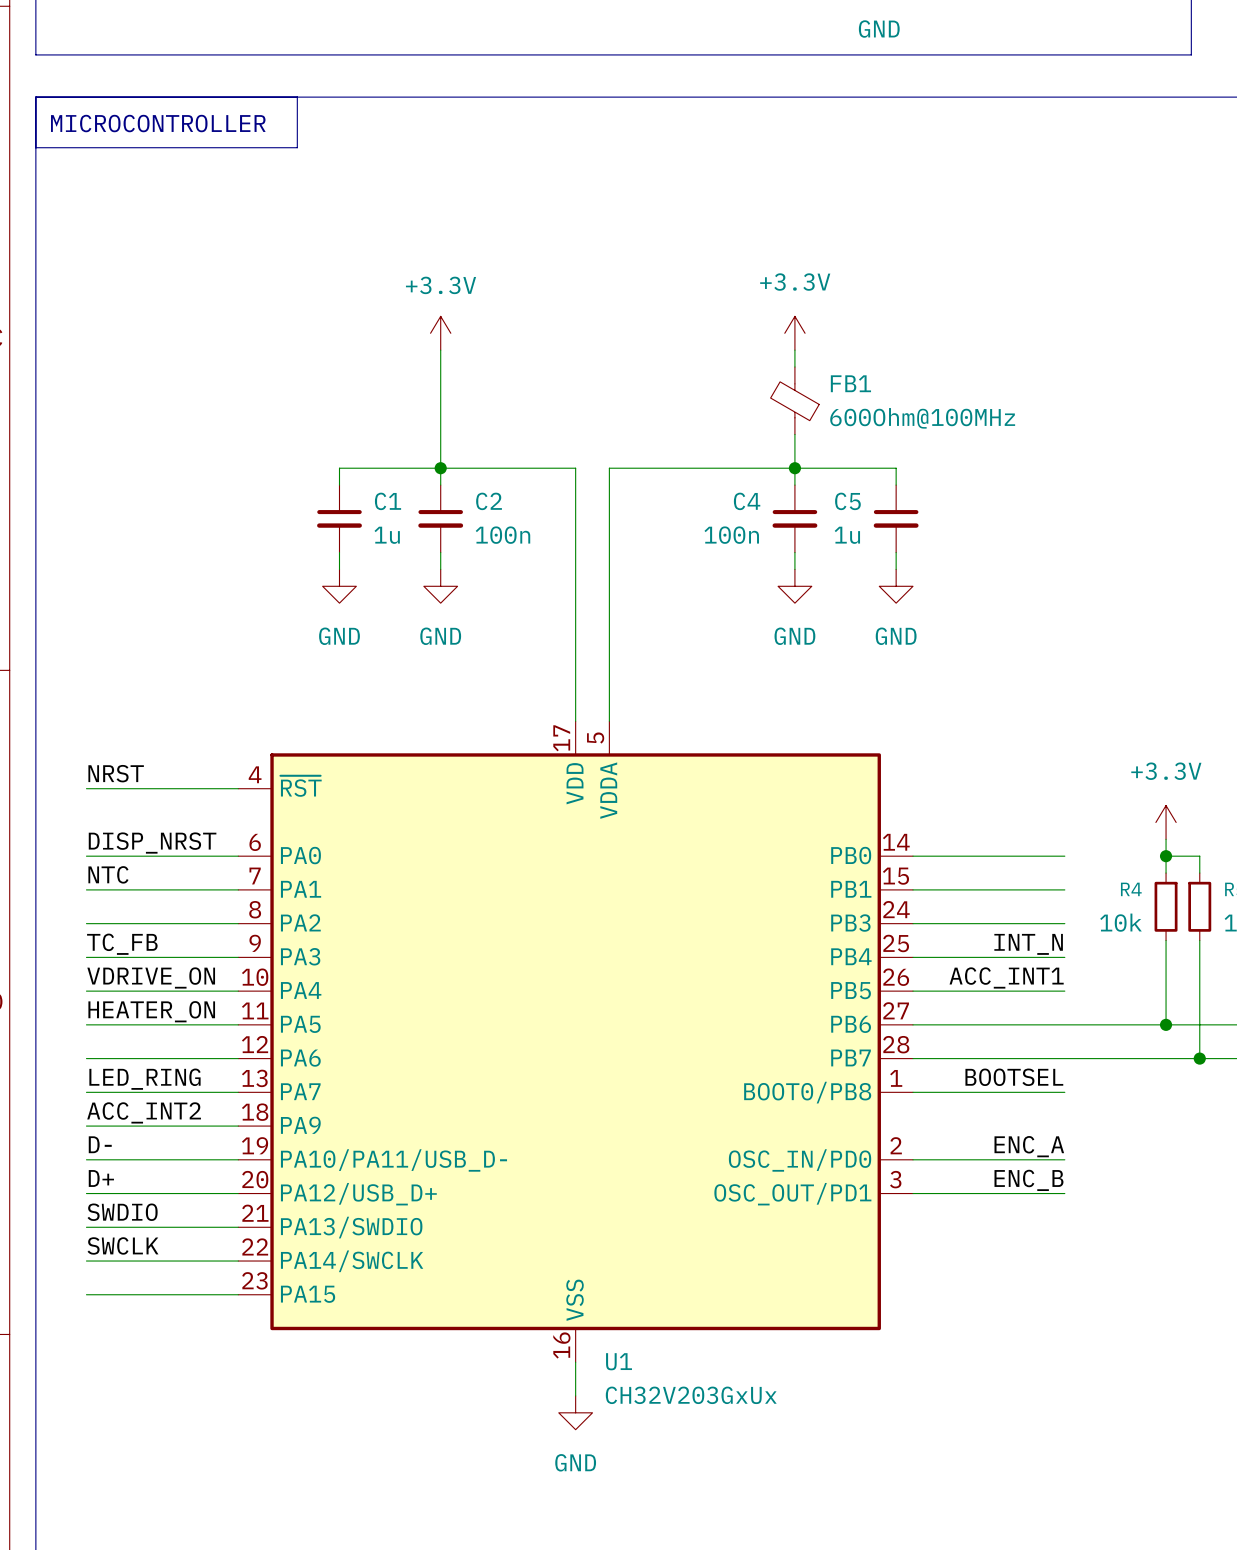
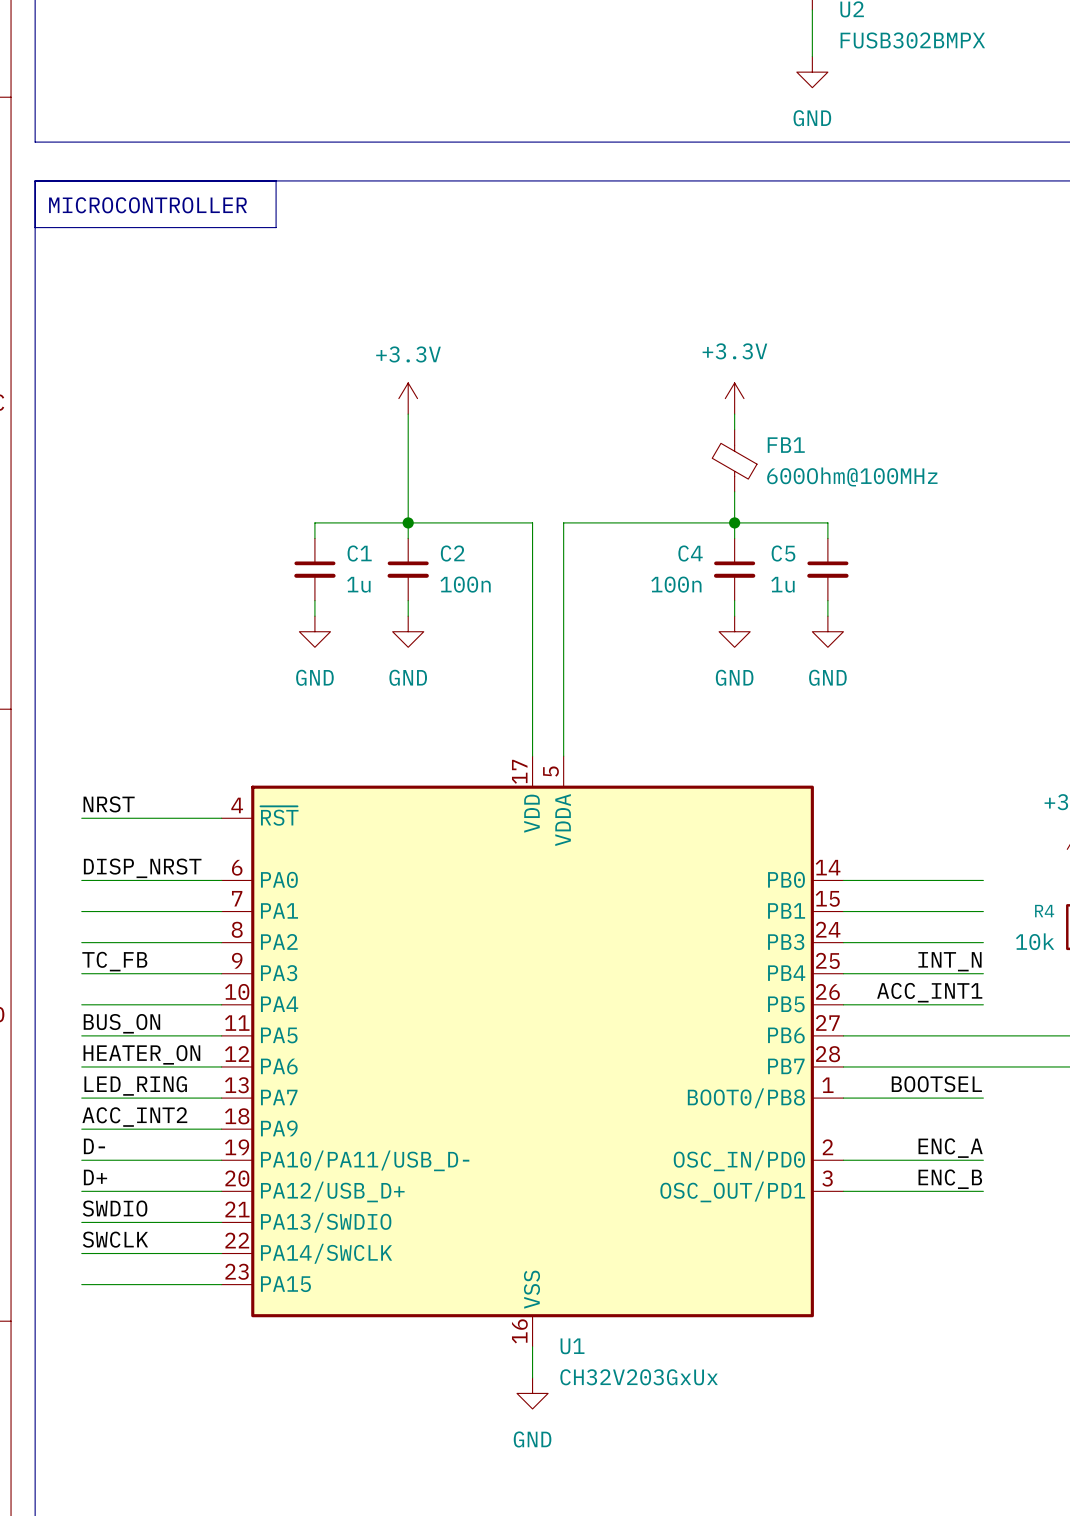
label: NTC (108, 874) -> none
label: VDRIVE_ON (151, 977) -> none
label: HEATER_ON (151, 1011) -> BUS_ON (121, 1023)
label: none -> HEATER_ON (141, 1054)

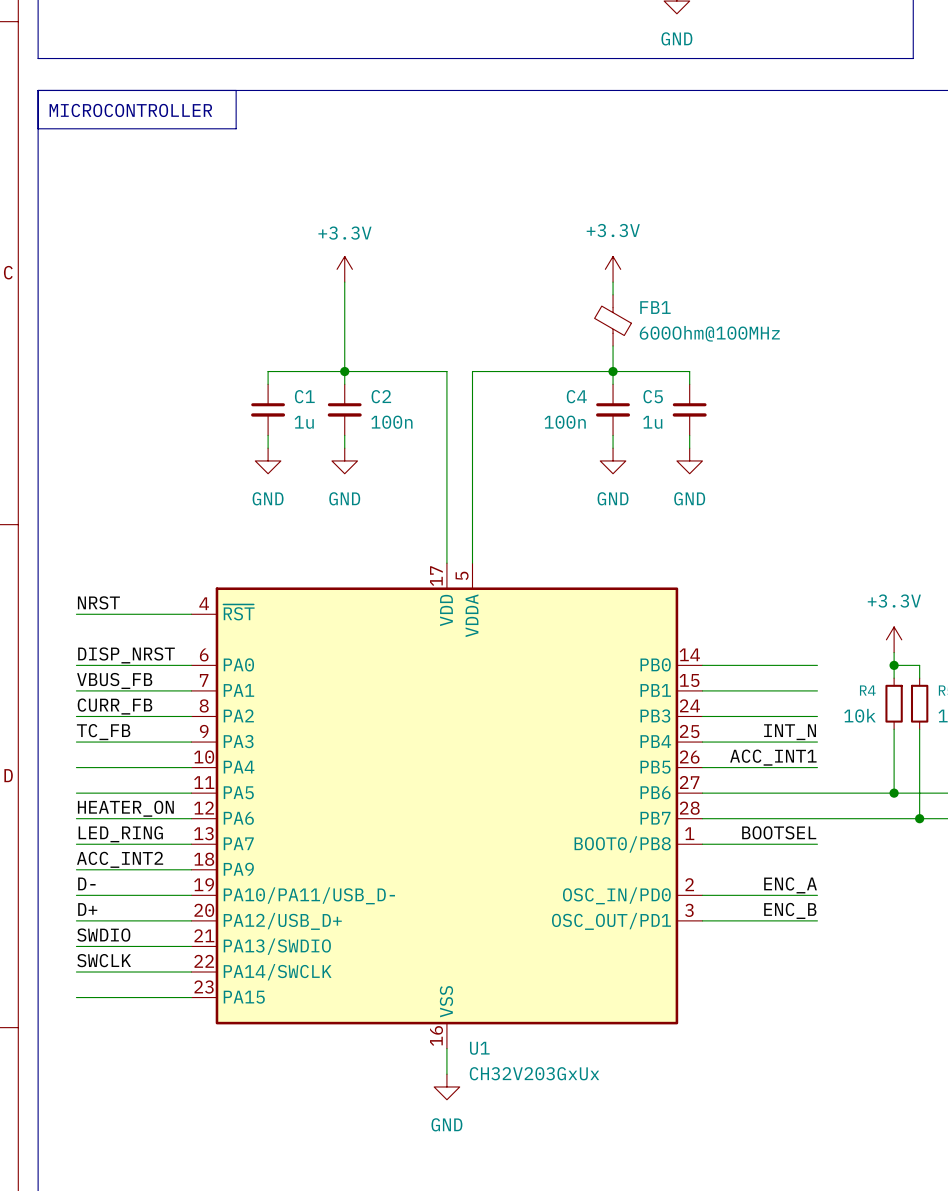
label: none -> VBUS_FB (114, 680)
label: none -> CURR_FB (115, 706)
label: BUS_ON (121, 1023) -> none

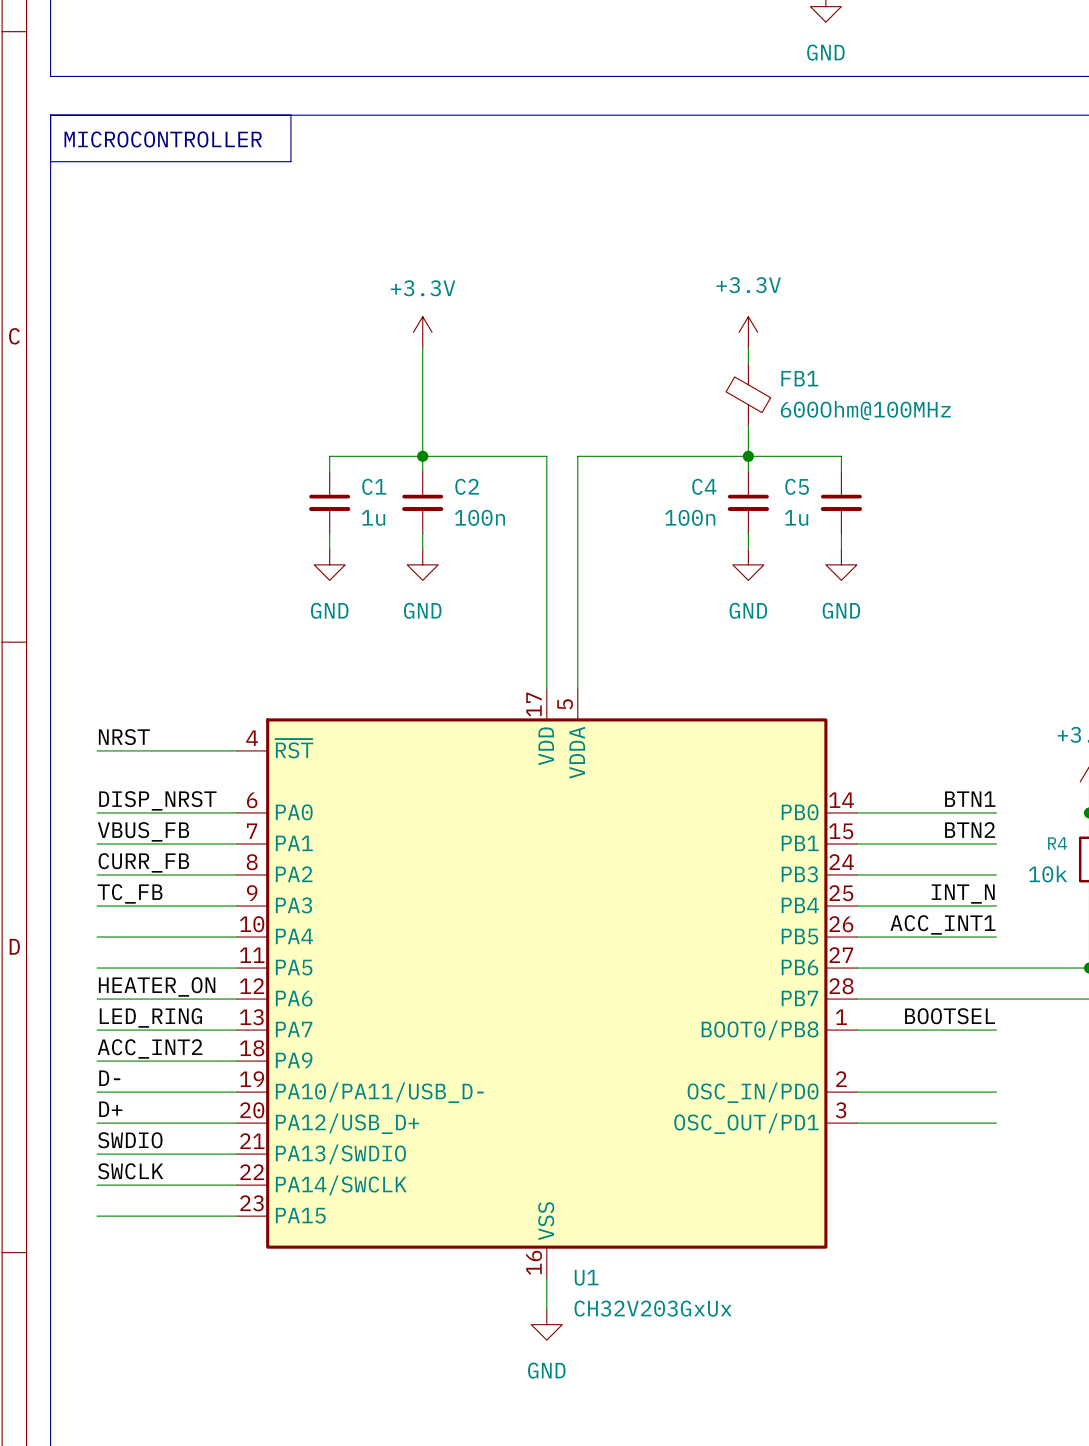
label: none -> BTN1 (970, 799)
label: none -> BTN2 (970, 830)
label: ENC_A (790, 885) -> none
label: ENC_B (790, 910) -> none

